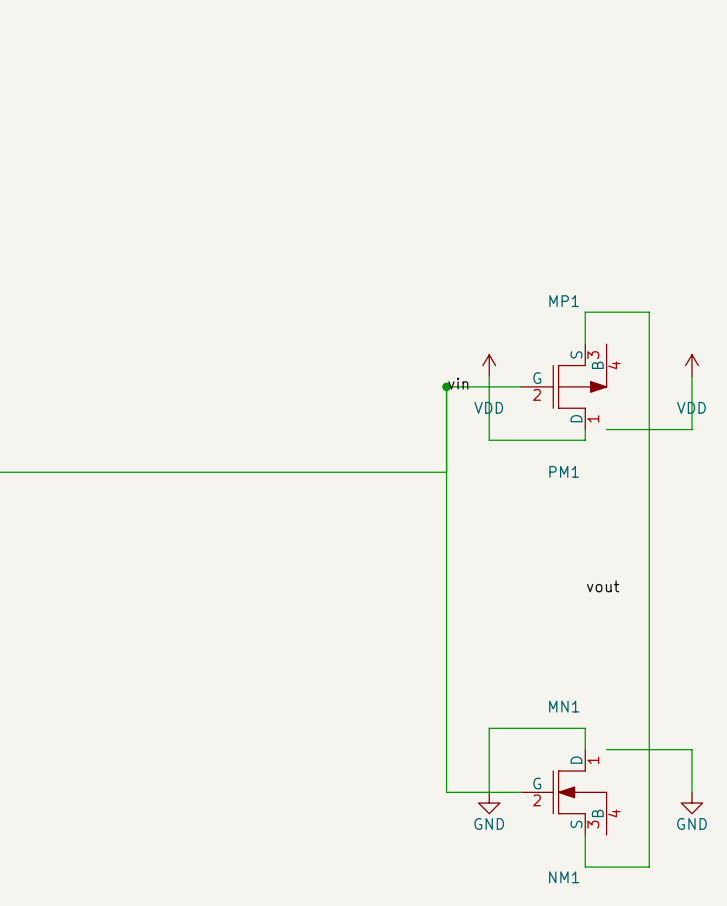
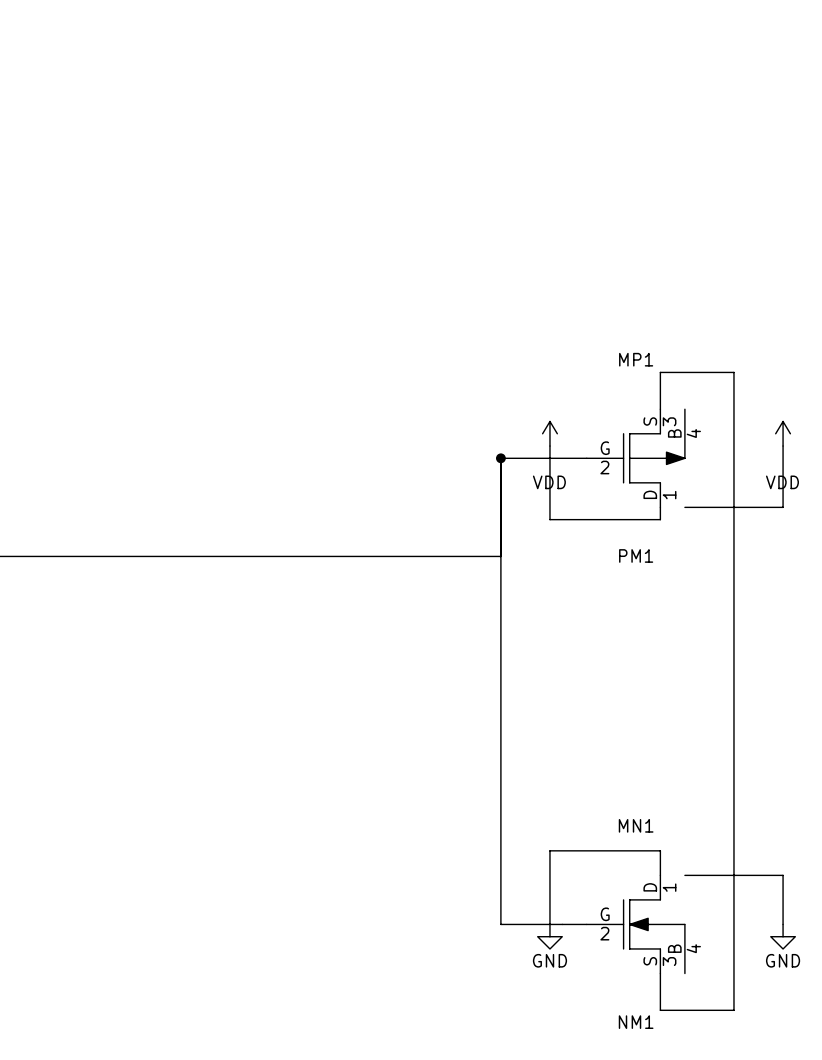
label: vin (458, 383) -> none
label: vout (603, 586) -> none

